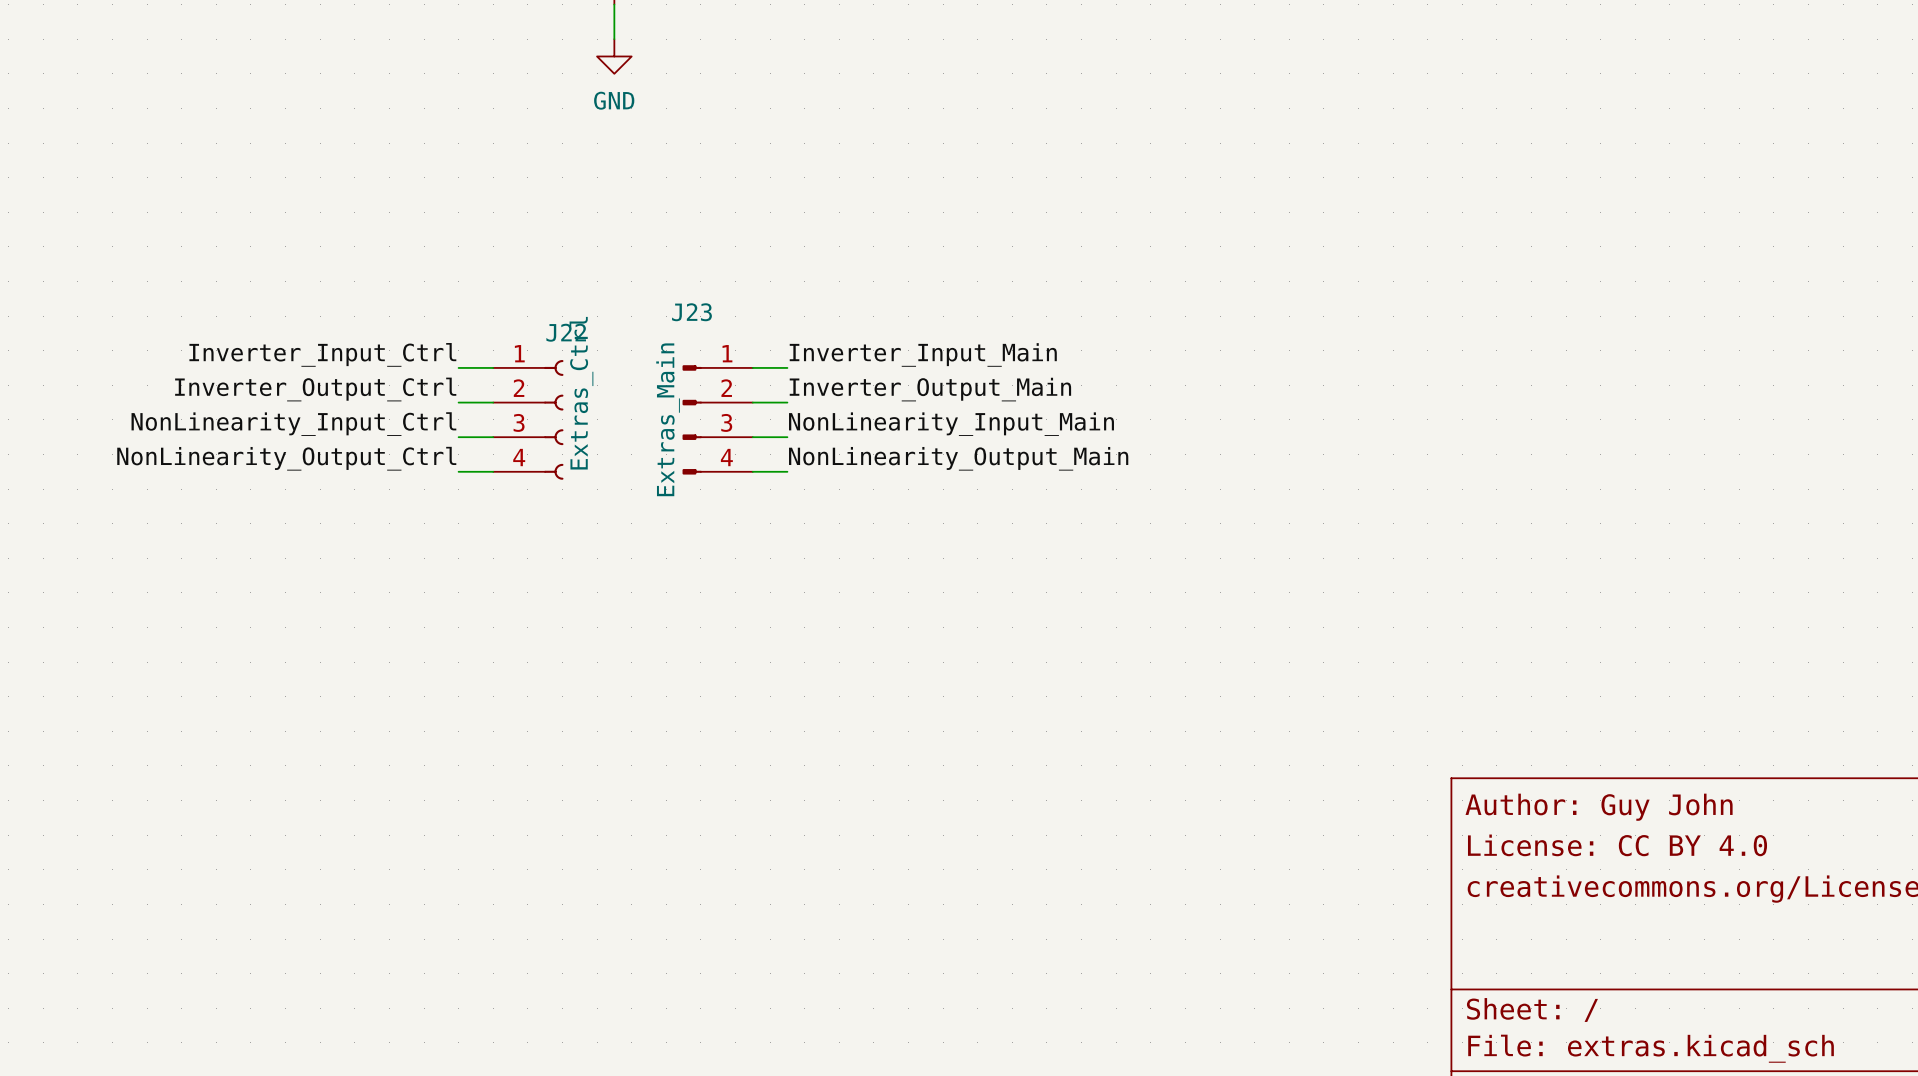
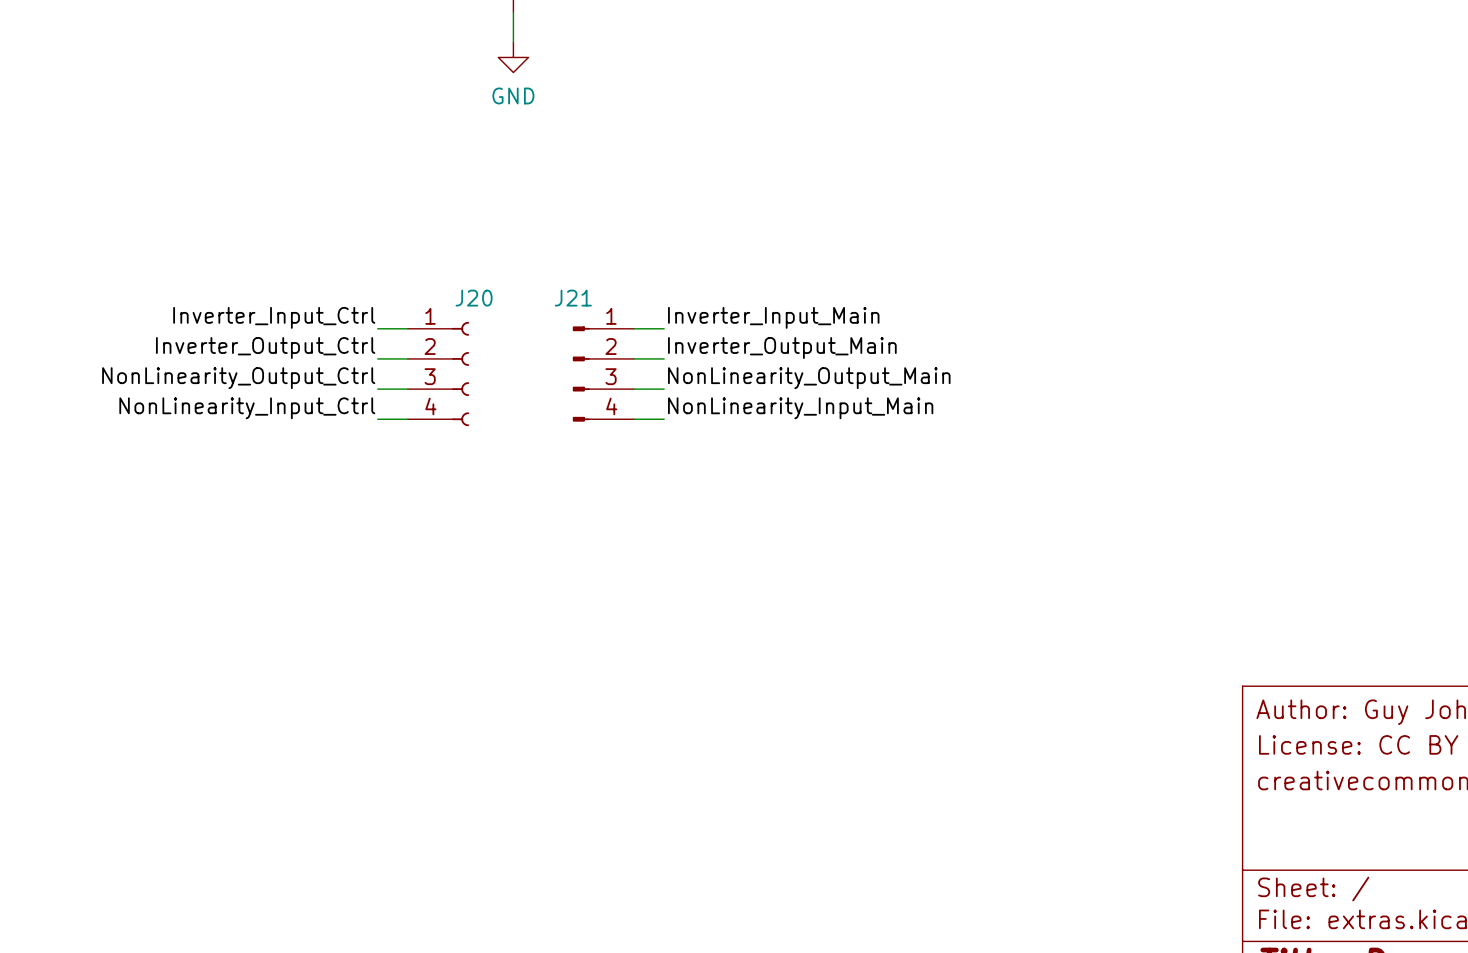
J23 name: J23 (691, 312) -> J21 (573, 298)
J22 name: J22 (566, 332) -> J20 (474, 298)
J22 value: Extras_Ctrl (581, 393) -> none
J23 value: Extras_Main (668, 419) -> none
label: NonLinearity_Input_Ctrl (293, 424) -> NonLinearity_Output_Ctrl (238, 378)
label: NonLinearity_Input_Main (951, 424) -> NonLinearity_Output_Main (809, 378)
label: NonLinearity_Output_Ctrl (286, 458) -> NonLinearity_Input_Ctrl (247, 408)
label: NonLinearity_Output_Main (958, 458) -> NonLinearity_Input_Main (800, 408)

